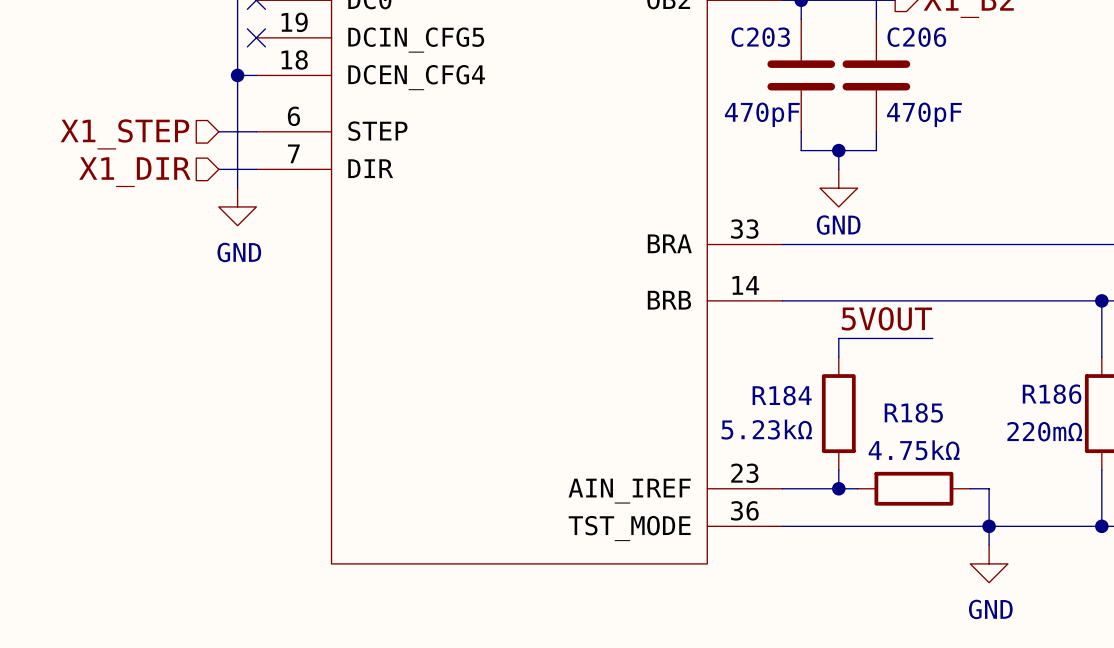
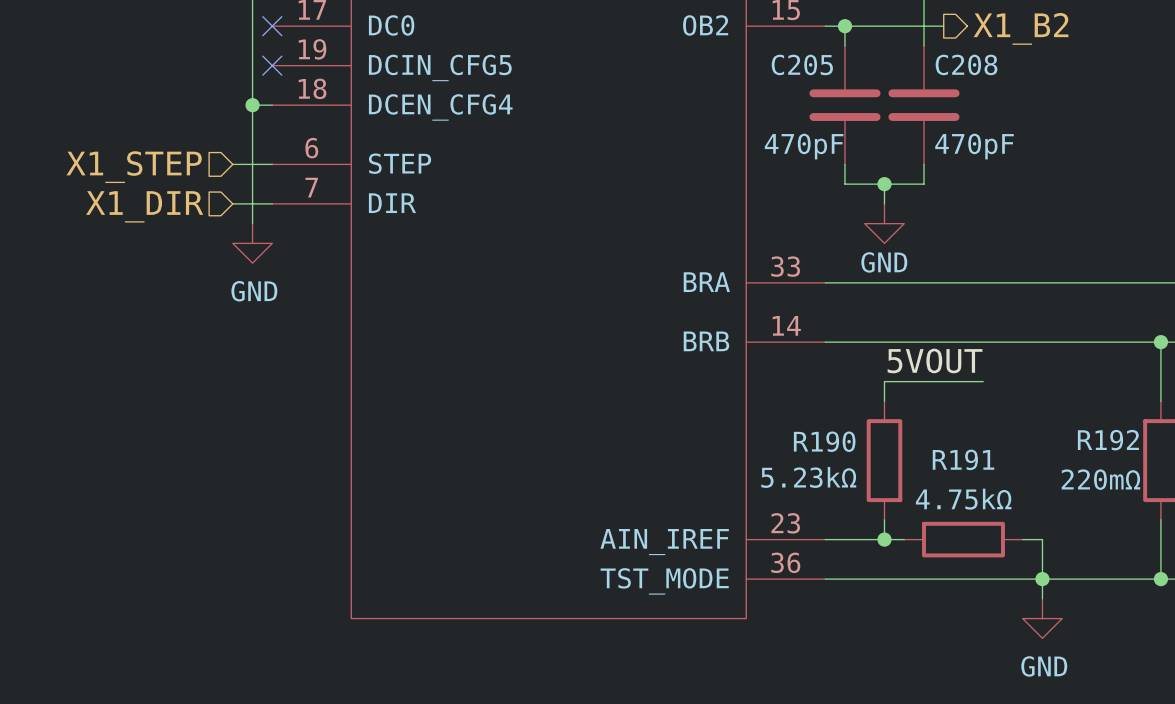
C203 name: C203 (760, 37) -> C205 (802, 64)
C206 name: C206 (916, 37) -> C208 (966, 64)
R186 name: R186 (1052, 394) -> R192 (1108, 440)
R184 name: R184 (782, 395) -> R190 (824, 441)
R185 name: R185 (913, 412) -> R191 (963, 459)

